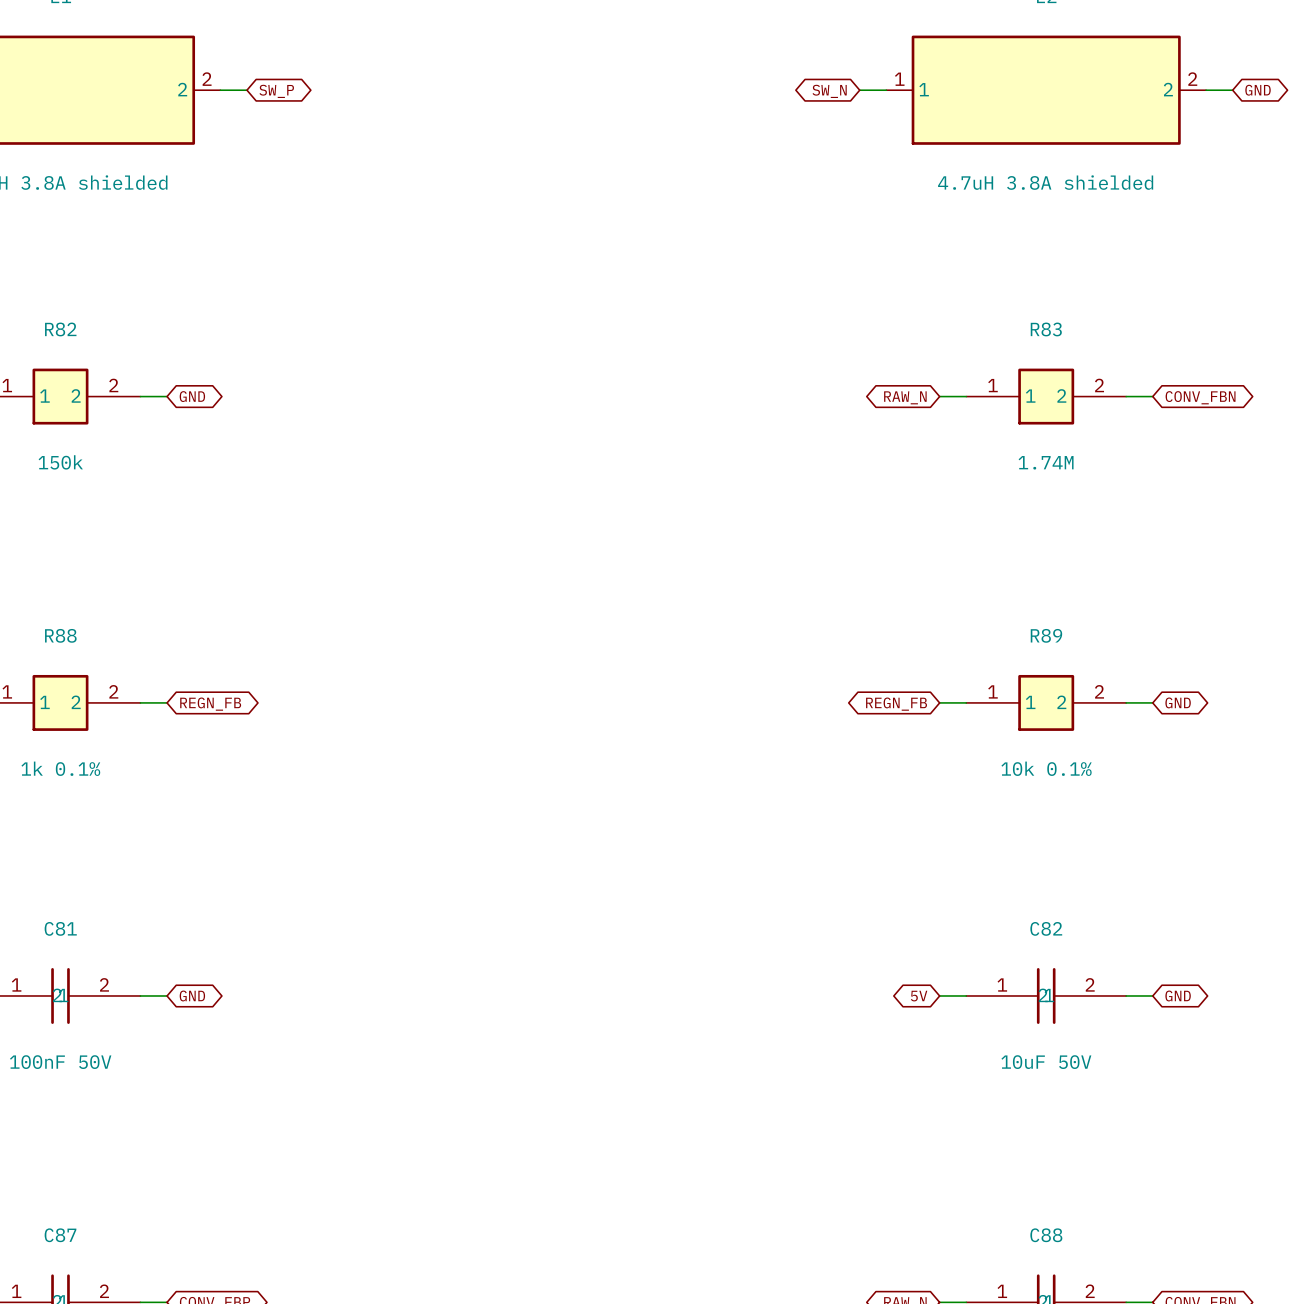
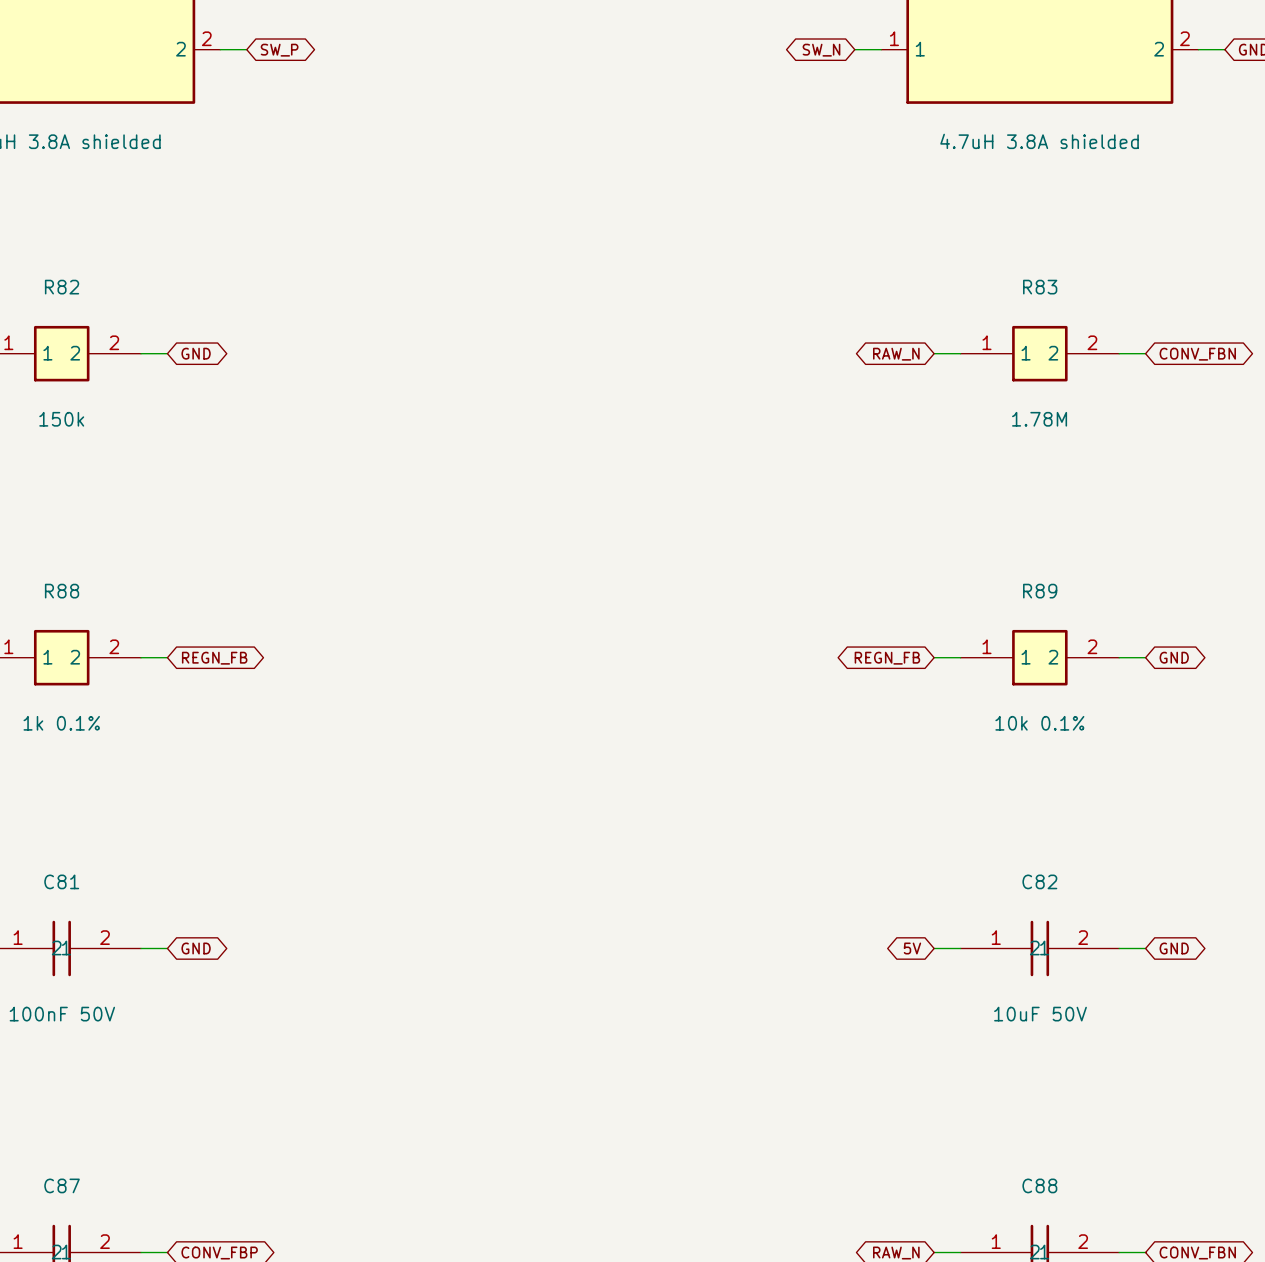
R83 value: 1.74M (1046, 462) -> 1.78M (1039, 419)

